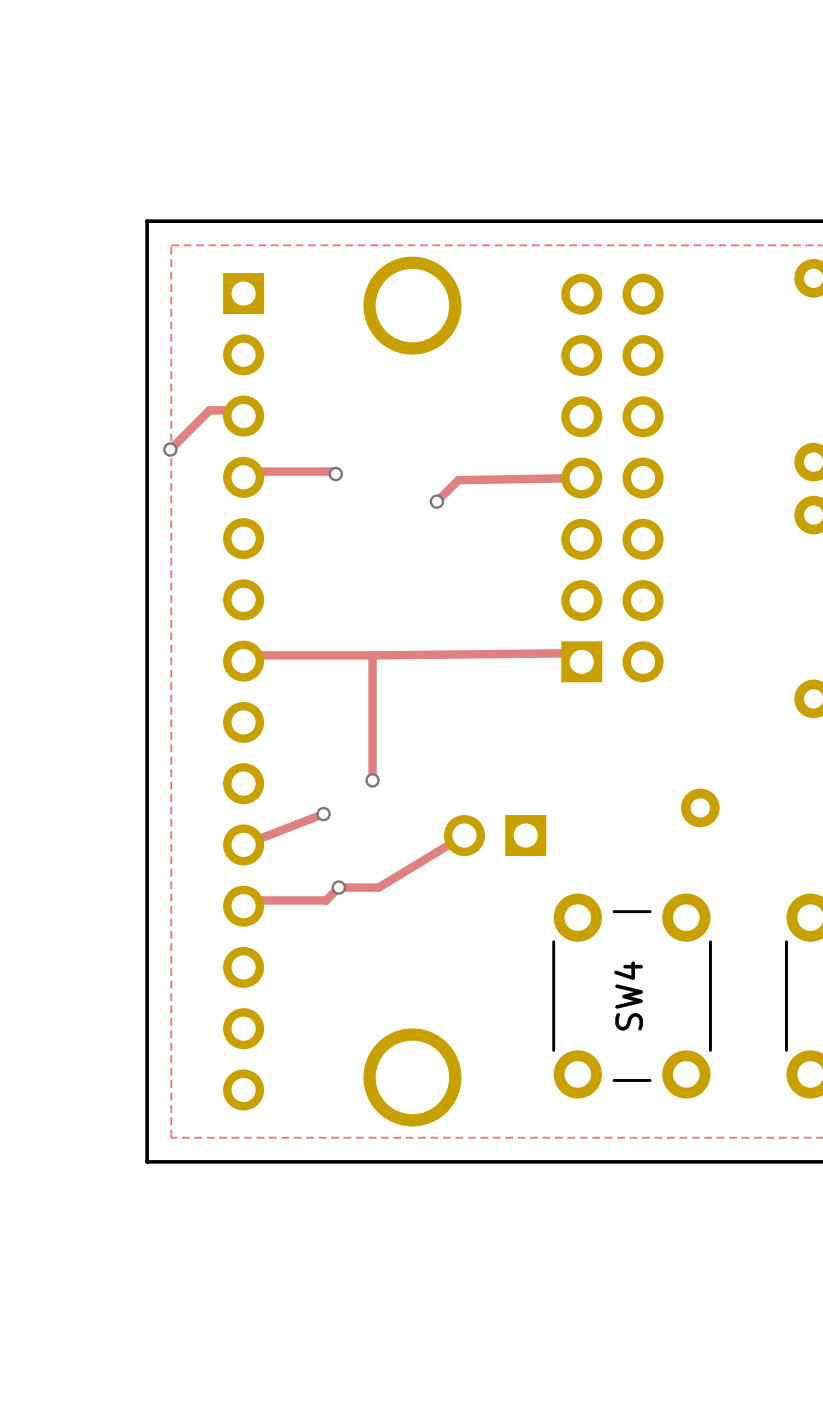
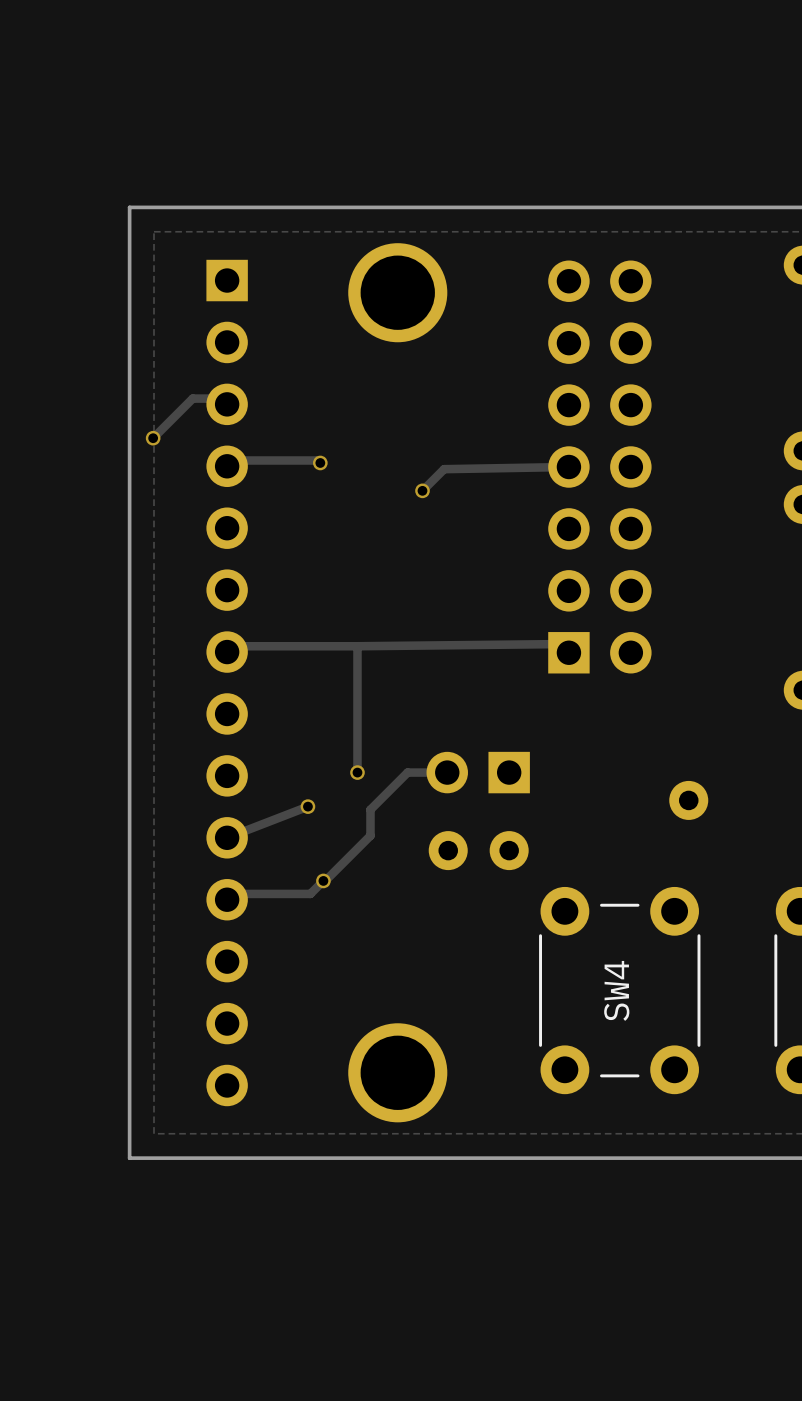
part: none -> (478, 772)
part footprint: [443, 815, 547, 857] -> [428, 831, 529, 871]
track: (464, 835) (378, 887) (340, 887) -> (447, 772) (407, 772) (370, 809) (370, 835) (325, 880)

